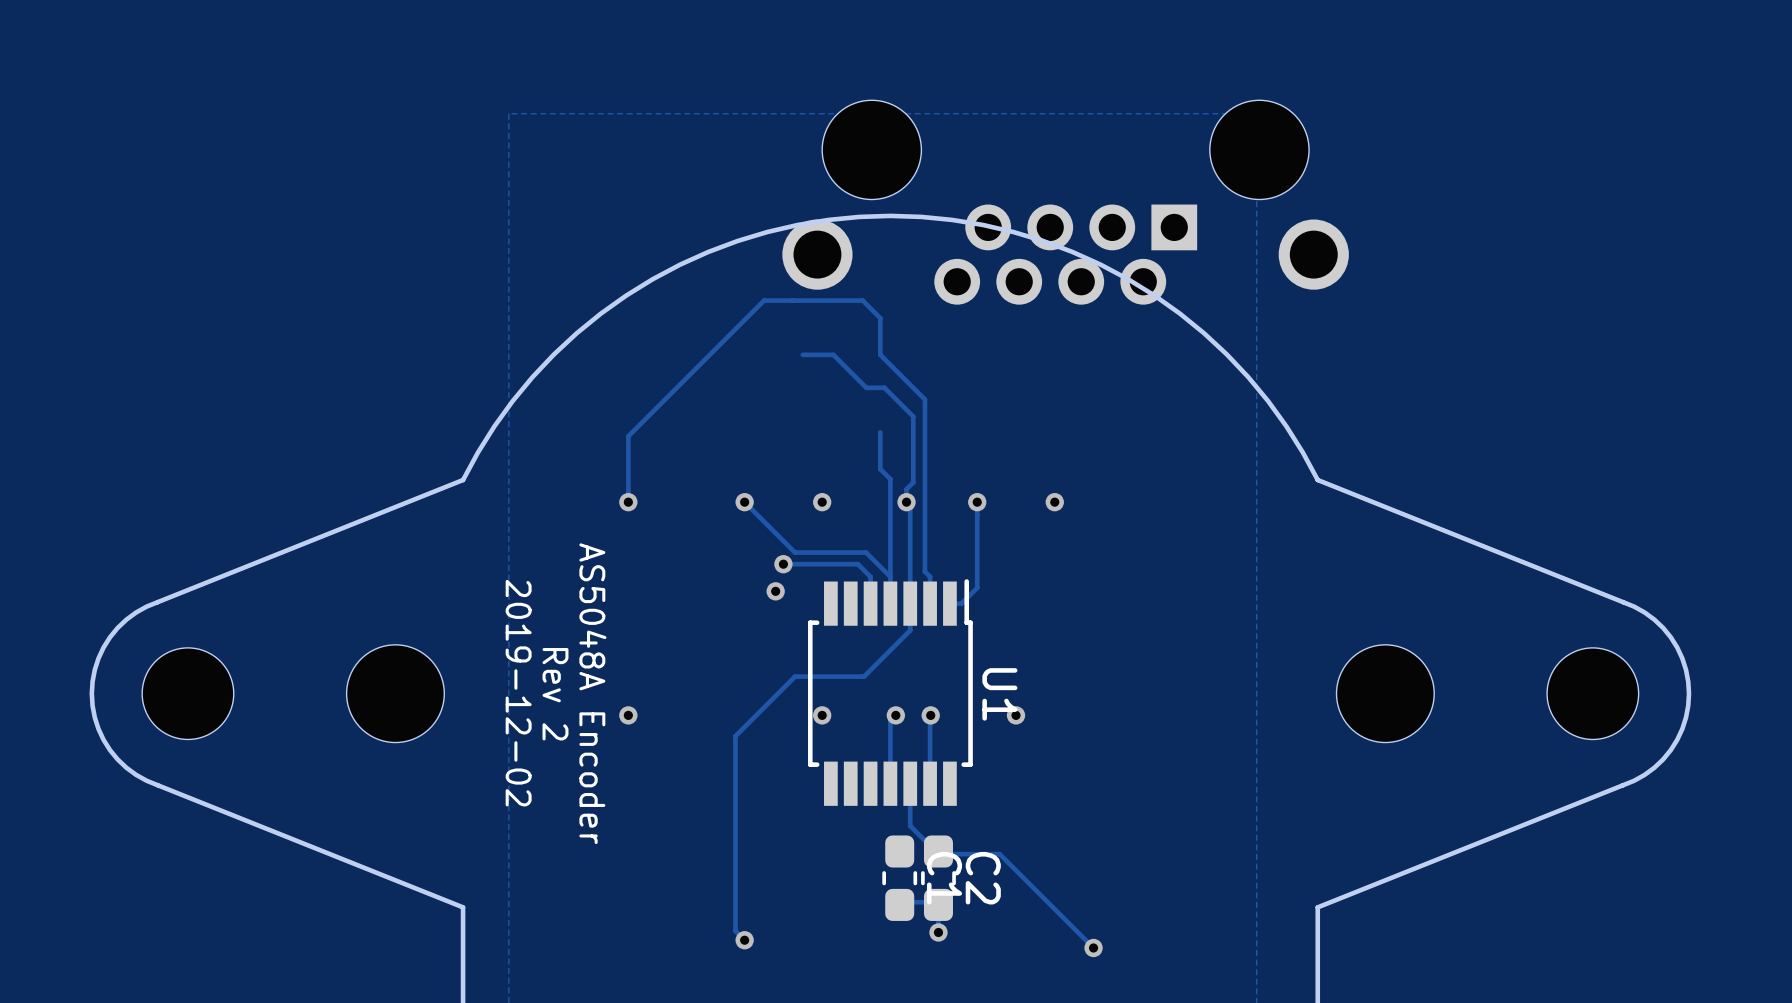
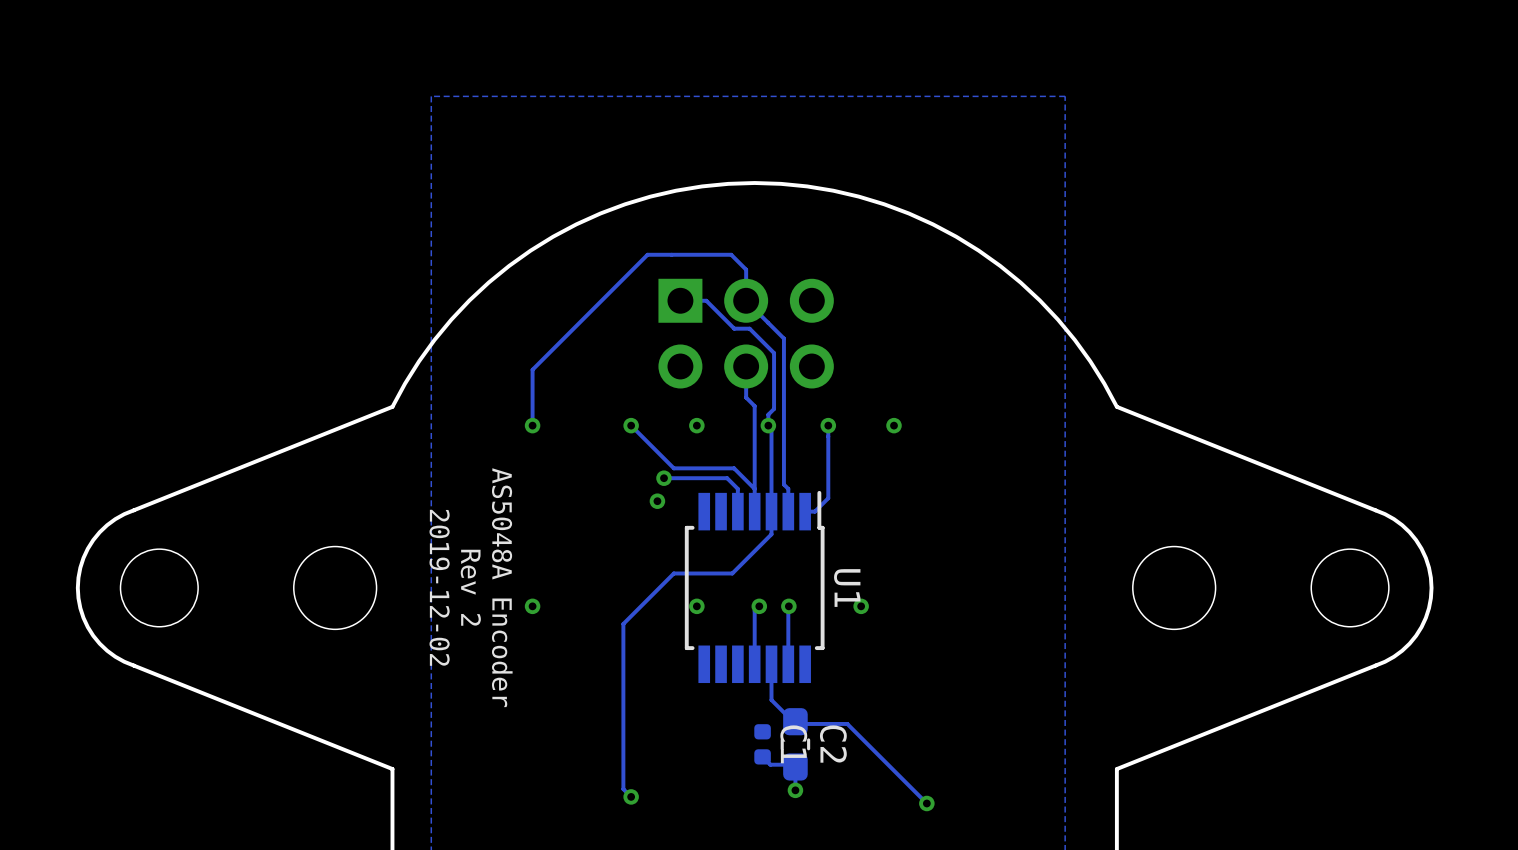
part: (1065, 202) -> none
part: none -> (746, 333)
C1 footprint: [882, 835, 918, 921] -> [754, 724, 771, 765]

